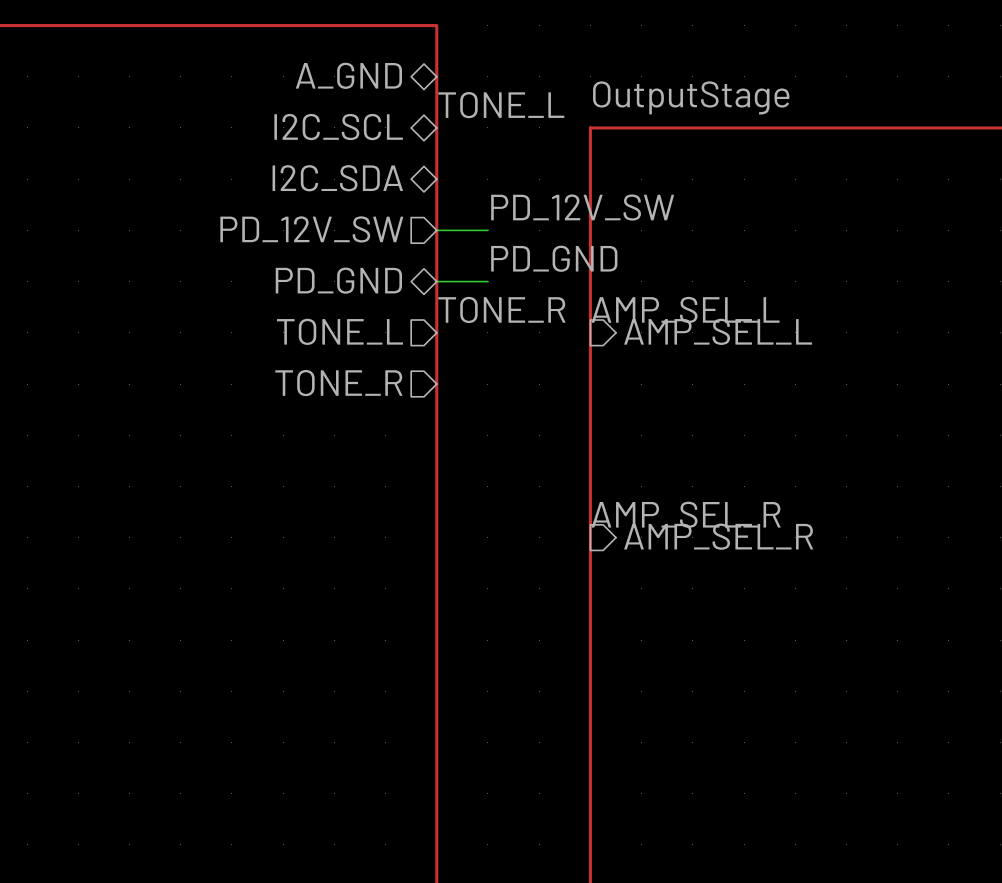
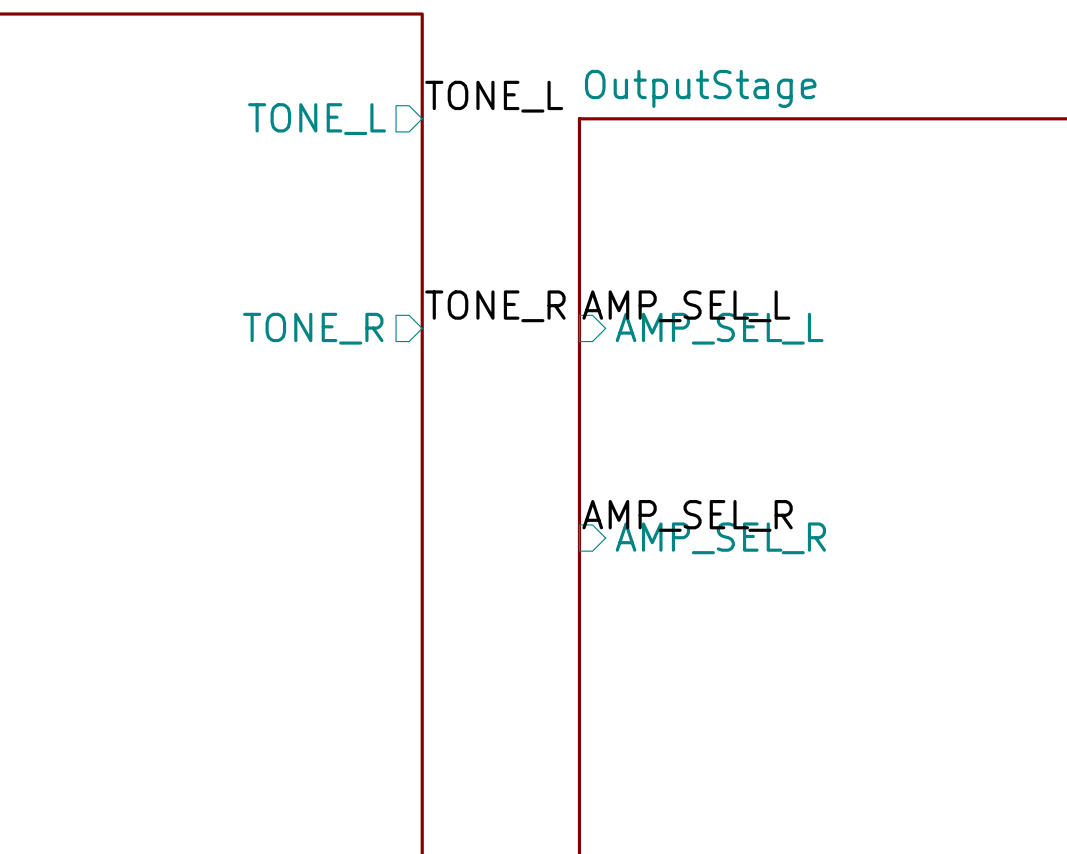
sheet pin: A_GND (348, 75) -> none
sheet pin shape: bidirectional (338, 127) -> output (317, 119)
sheet pin: I2C_SCL (338, 127) -> TONE_L (317, 119)
sheet pin: I2C_SDA (337, 178) -> none
label: PD_12V_SW (582, 207) -> none
sheet pin: PD_12V_SW (311, 229) -> none
wire: (436, 230) (487, 230) -> none
label: PD_GND (554, 258) -> none
sheet pin: PD_GND (338, 280) -> none
wire: (436, 281) (487, 281) -> none
sheet pin: TONE_L (339, 331) -> TONE_R (313, 328)
sheet pin: TONE_R (338, 383) -> none

